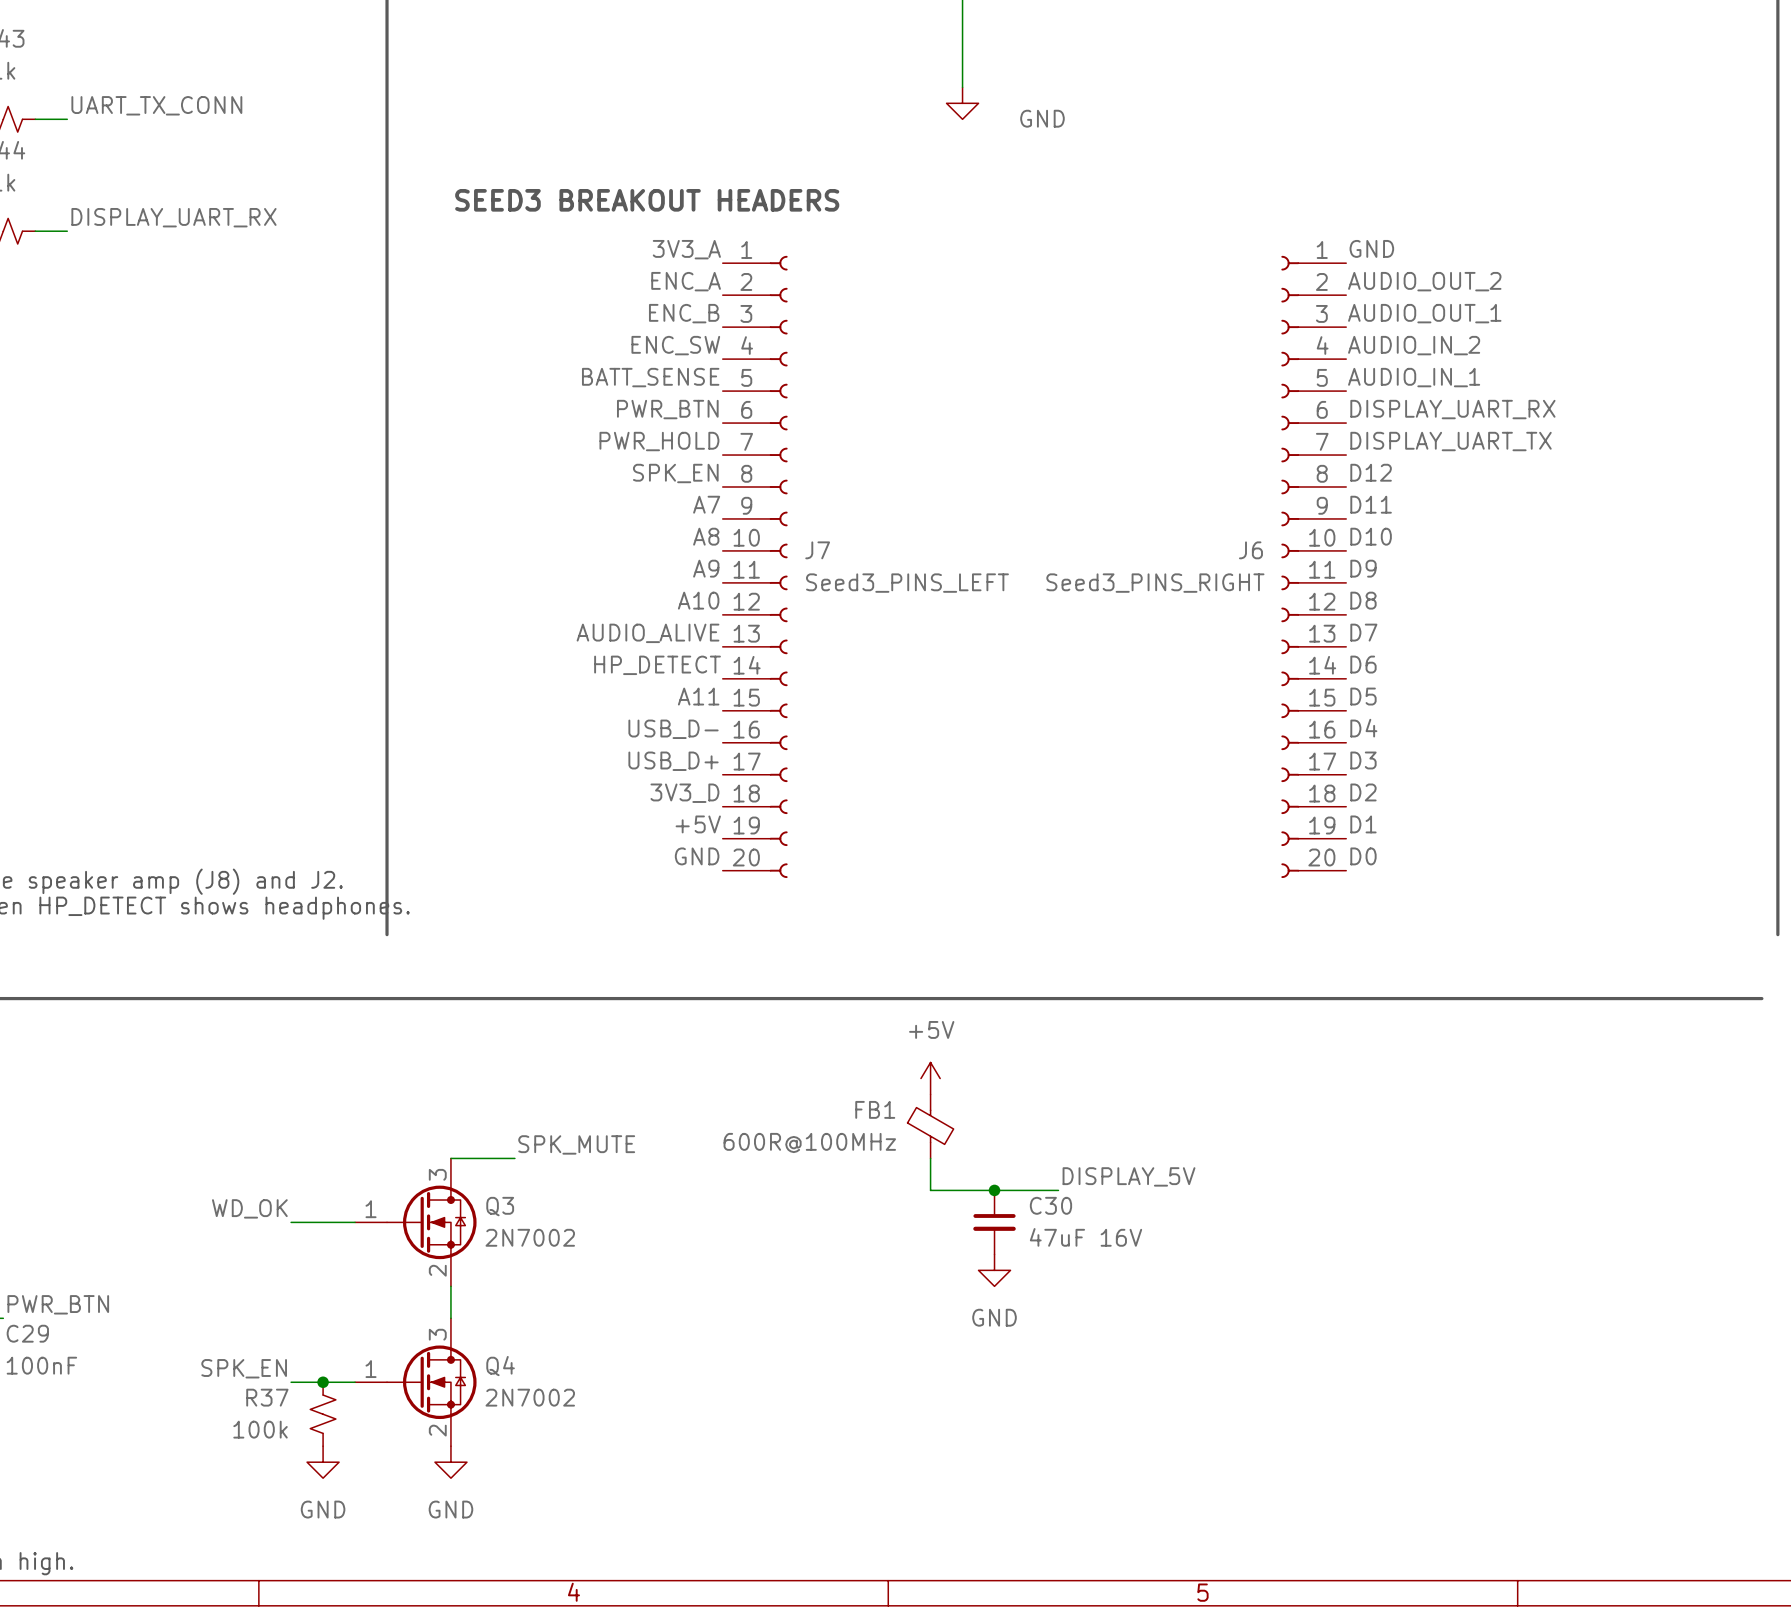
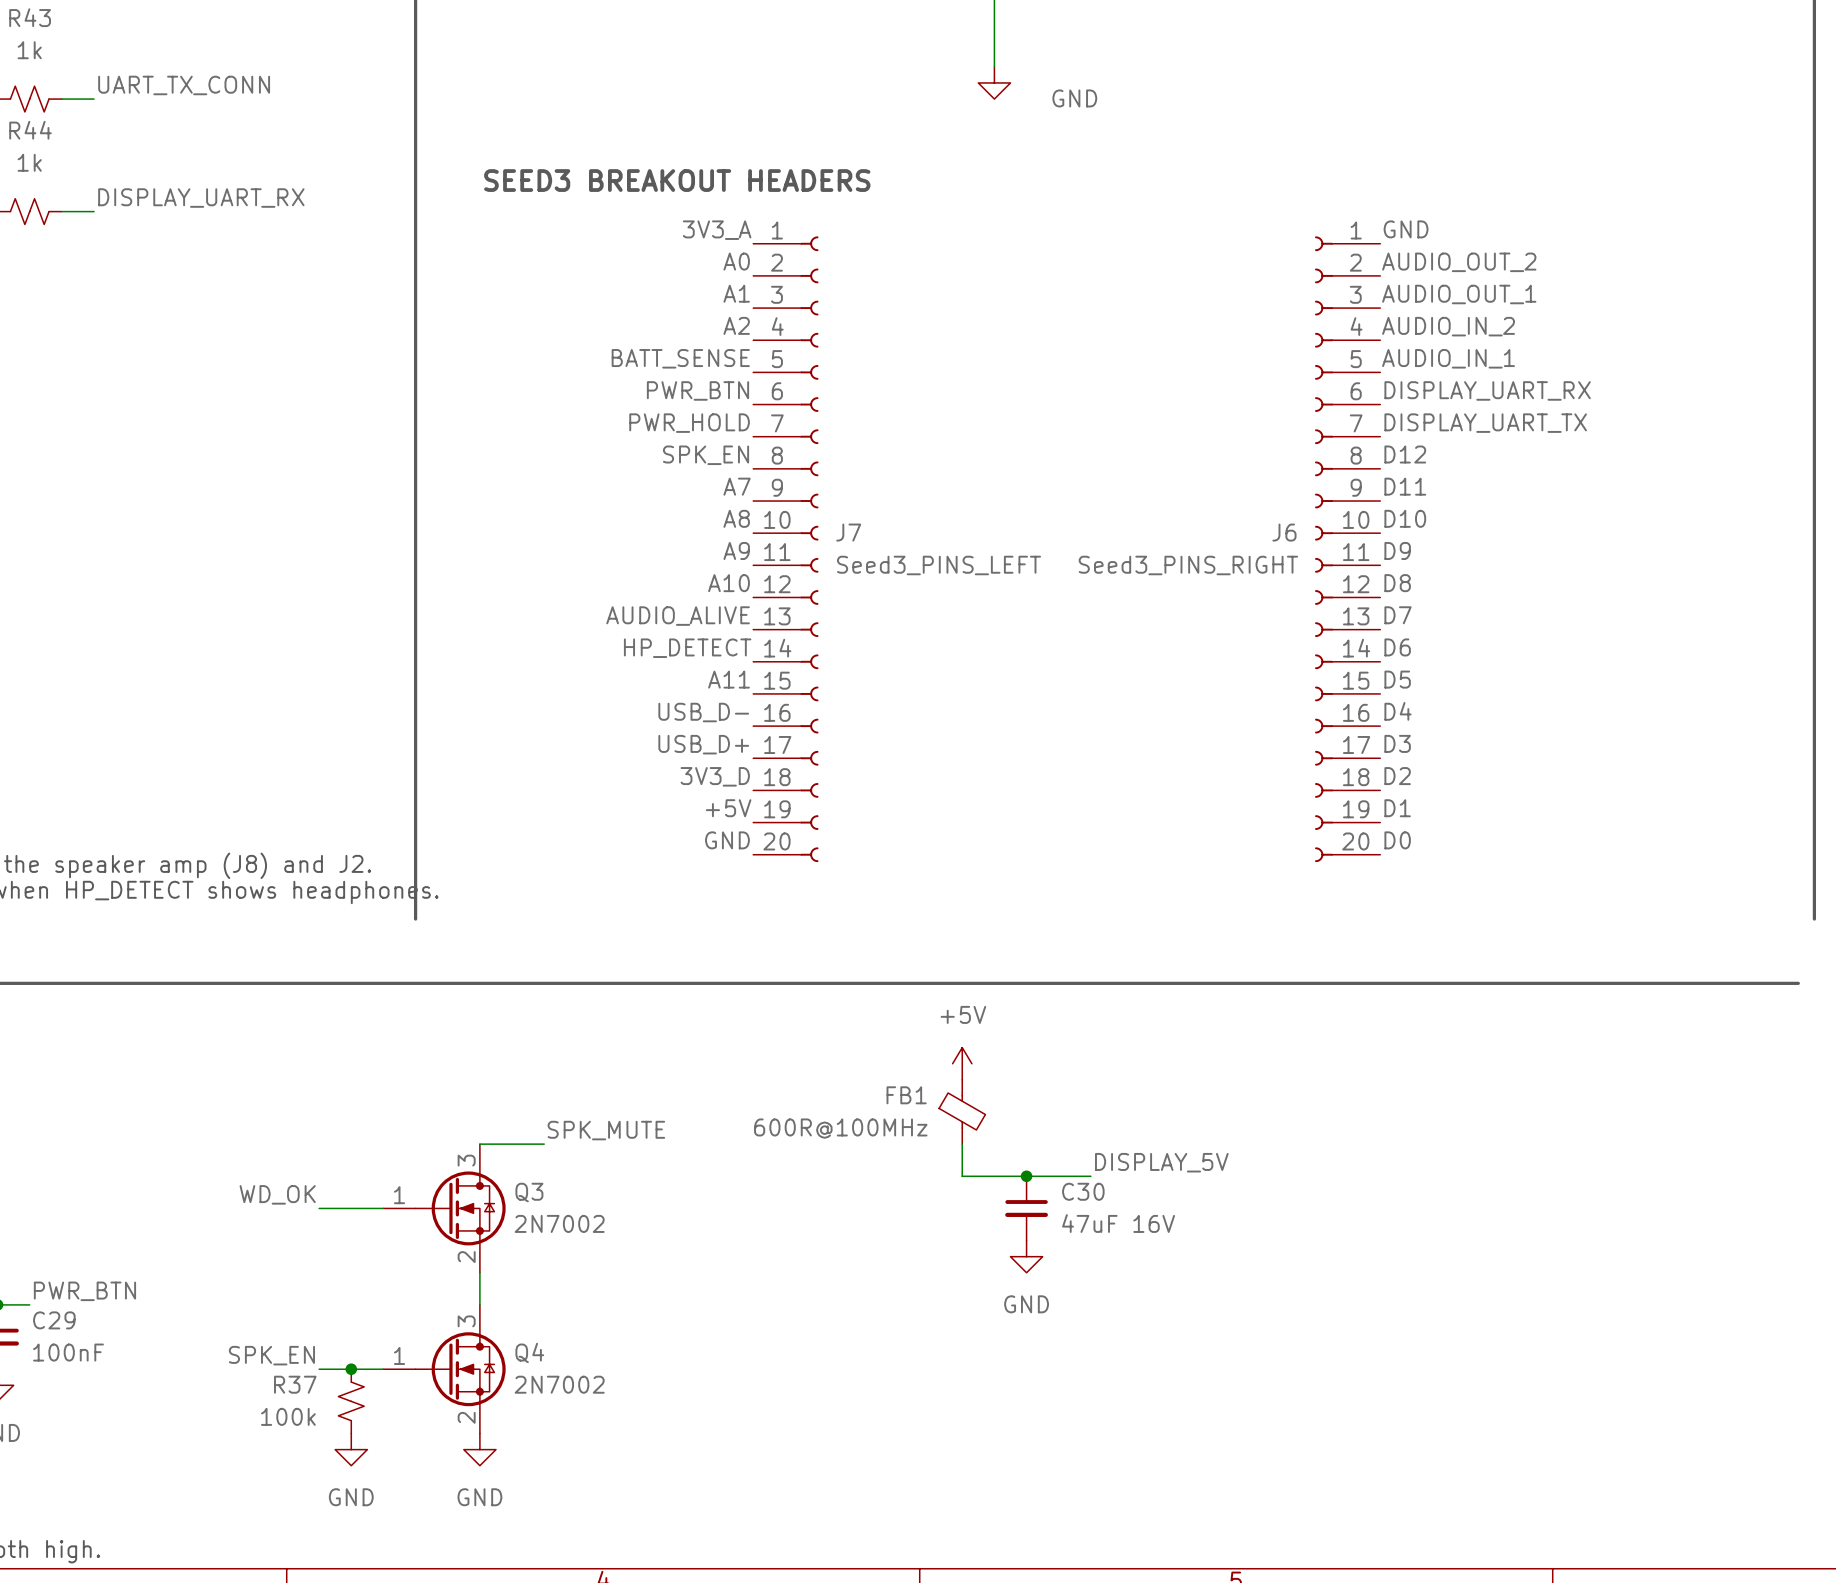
label: ENC_A (686, 281) -> A0 (736, 261)
label: ENC_B (684, 313) -> A1 (736, 293)
label: ENC_SW (675, 345) -> A2 (736, 325)

